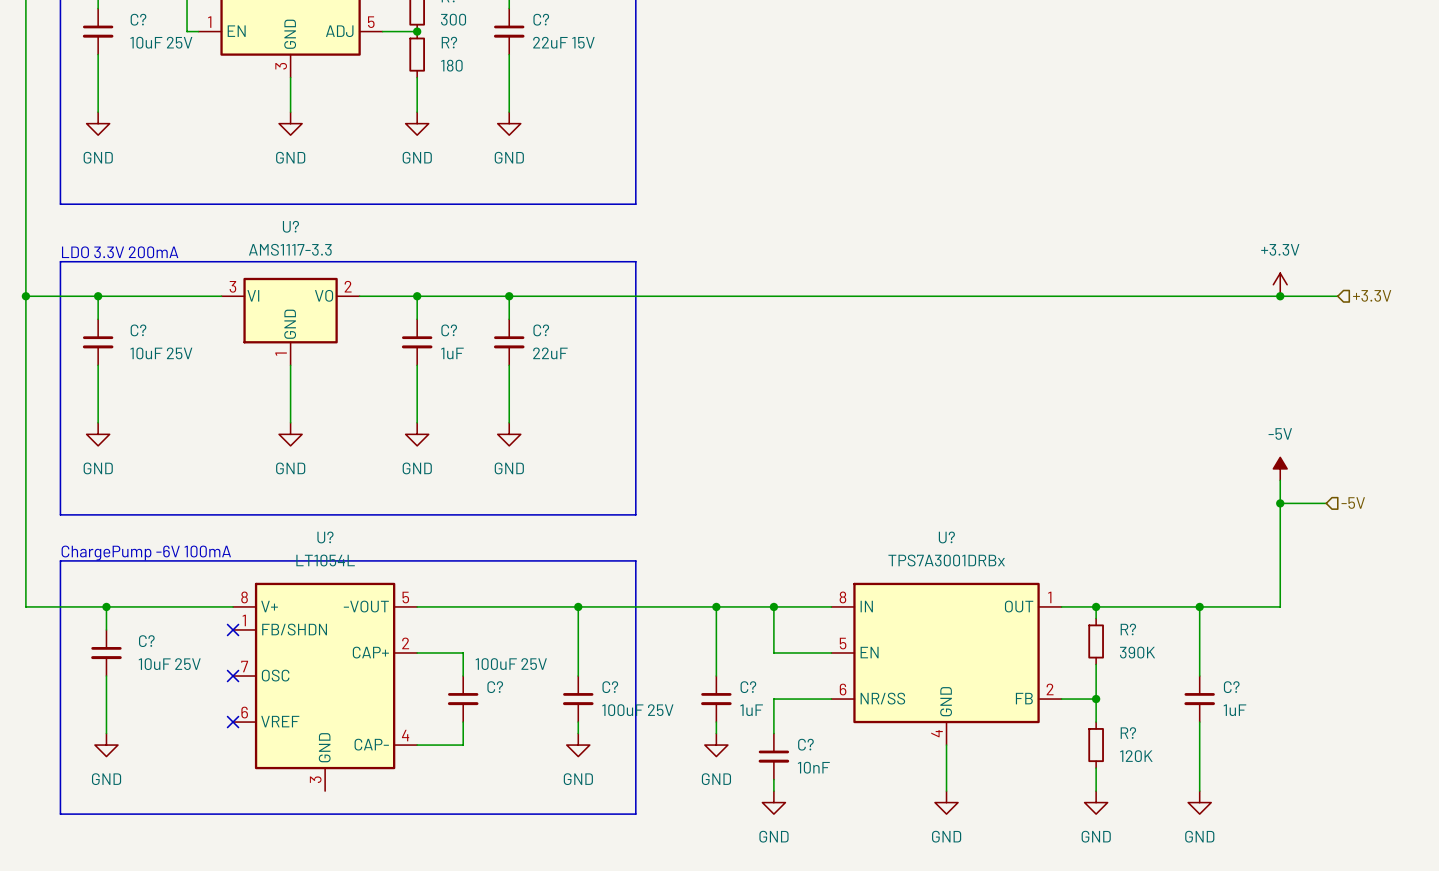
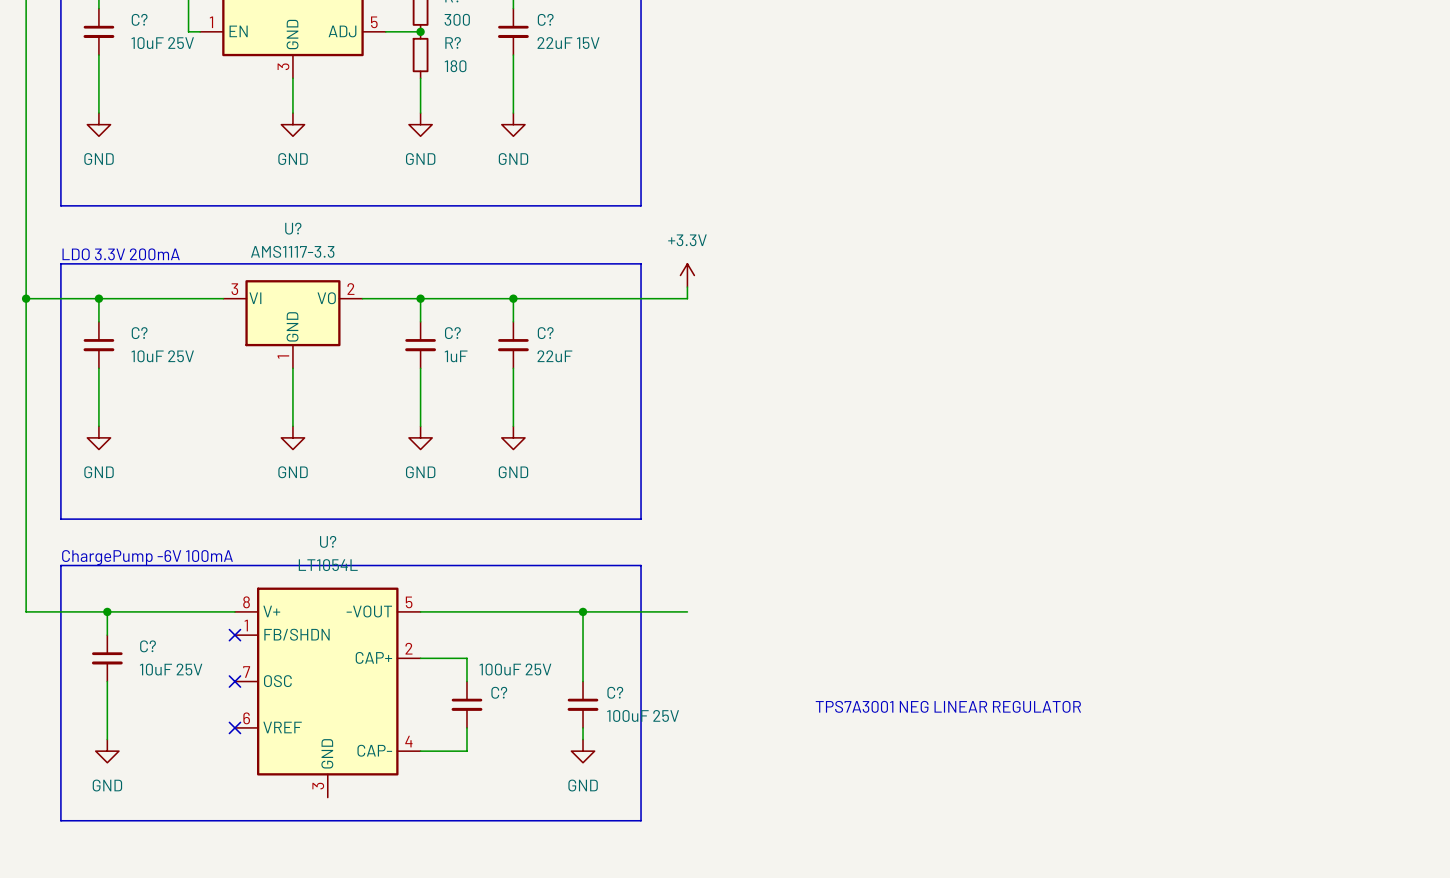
power symbol: none -> +3.3V (687, 275)
power symbol: +3.3V (1280, 284) -> none
hierarchical label: +3.3V (1372, 295) -> none
wire: (681, 296) (1337, 296) -> (687, 298) (687, 287)
junction: (1280, 296) -> none
power symbol: -5V (1280, 468) -> none
wire: (1280, 480) (1280, 606) (1061, 606) -> none
wire: (1280, 503) (1326, 503) -> none
junction: (1280, 503) -> none
hierarchical label: -5V (1353, 503) -> none
wire: (681, 606) (831, 606) -> none
wire: (716, 606) (716, 676) -> none
junction: (716, 606) -> none
wire: (773, 606) (773, 652) (831, 652) -> none
junction: (773, 606) -> none
wire: (1096, 606) (1096, 618) -> none
junction: (1096, 606) -> none
wire: (1199, 606) (1199, 676) -> none
junction: (1199, 606) -> none
R?: 390K (1096, 641) -> none
U?: TPS7A3001DRBx (946, 663) -> none
wire: (1096, 664) (1096, 722) -> none
C?: 1uF (716, 699) -> none
wire: (831, 699) (773, 699) (773, 733) -> none
wire: (1061, 699) (1096, 699) -> none
junction: (1096, 699) -> none
C?: 1uF (1199, 699) -> none
text: none -> TPS7A3001 NEG LINEAR REGULATOR (948, 706)
wire: (716, 722) (716, 733) -> none
wire: (1199, 722) (1199, 791) -> none
power symbol: GND (716, 745) -> none
wire: (946, 745) (946, 791) -> none
R?: 120K (1096, 745) -> none
C?: 10nF (773, 756) -> none
wire: (1096, 768) (1096, 791) -> none
wire: (773, 779) (773, 791) -> none
power symbol: GND (773, 802) -> none
power symbol: GND (946, 802) -> none
power symbol: GND (1096, 802) -> none
power symbol: GND (1199, 802) -> none

